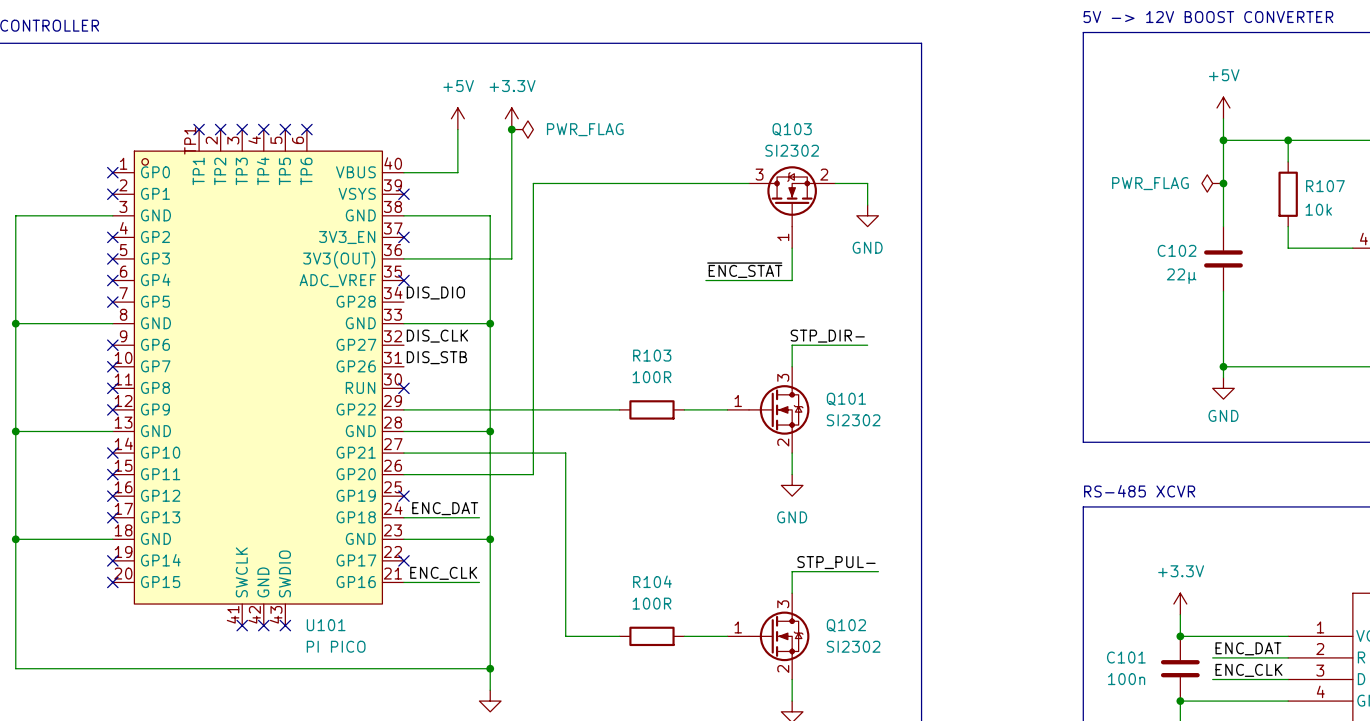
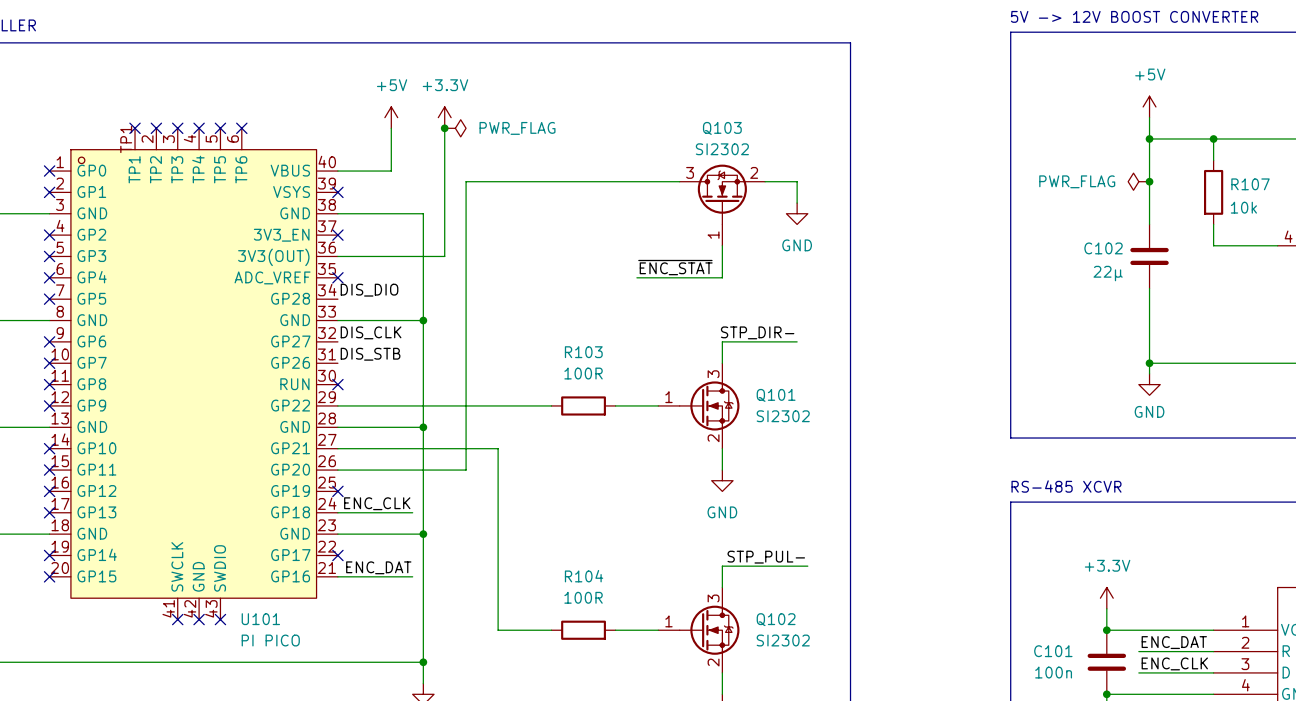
label: ENC_DAT (445, 508) -> ENC_CLK (377, 503)
label: ENC_CLK (443, 573) -> ENC_DAT (378, 567)

